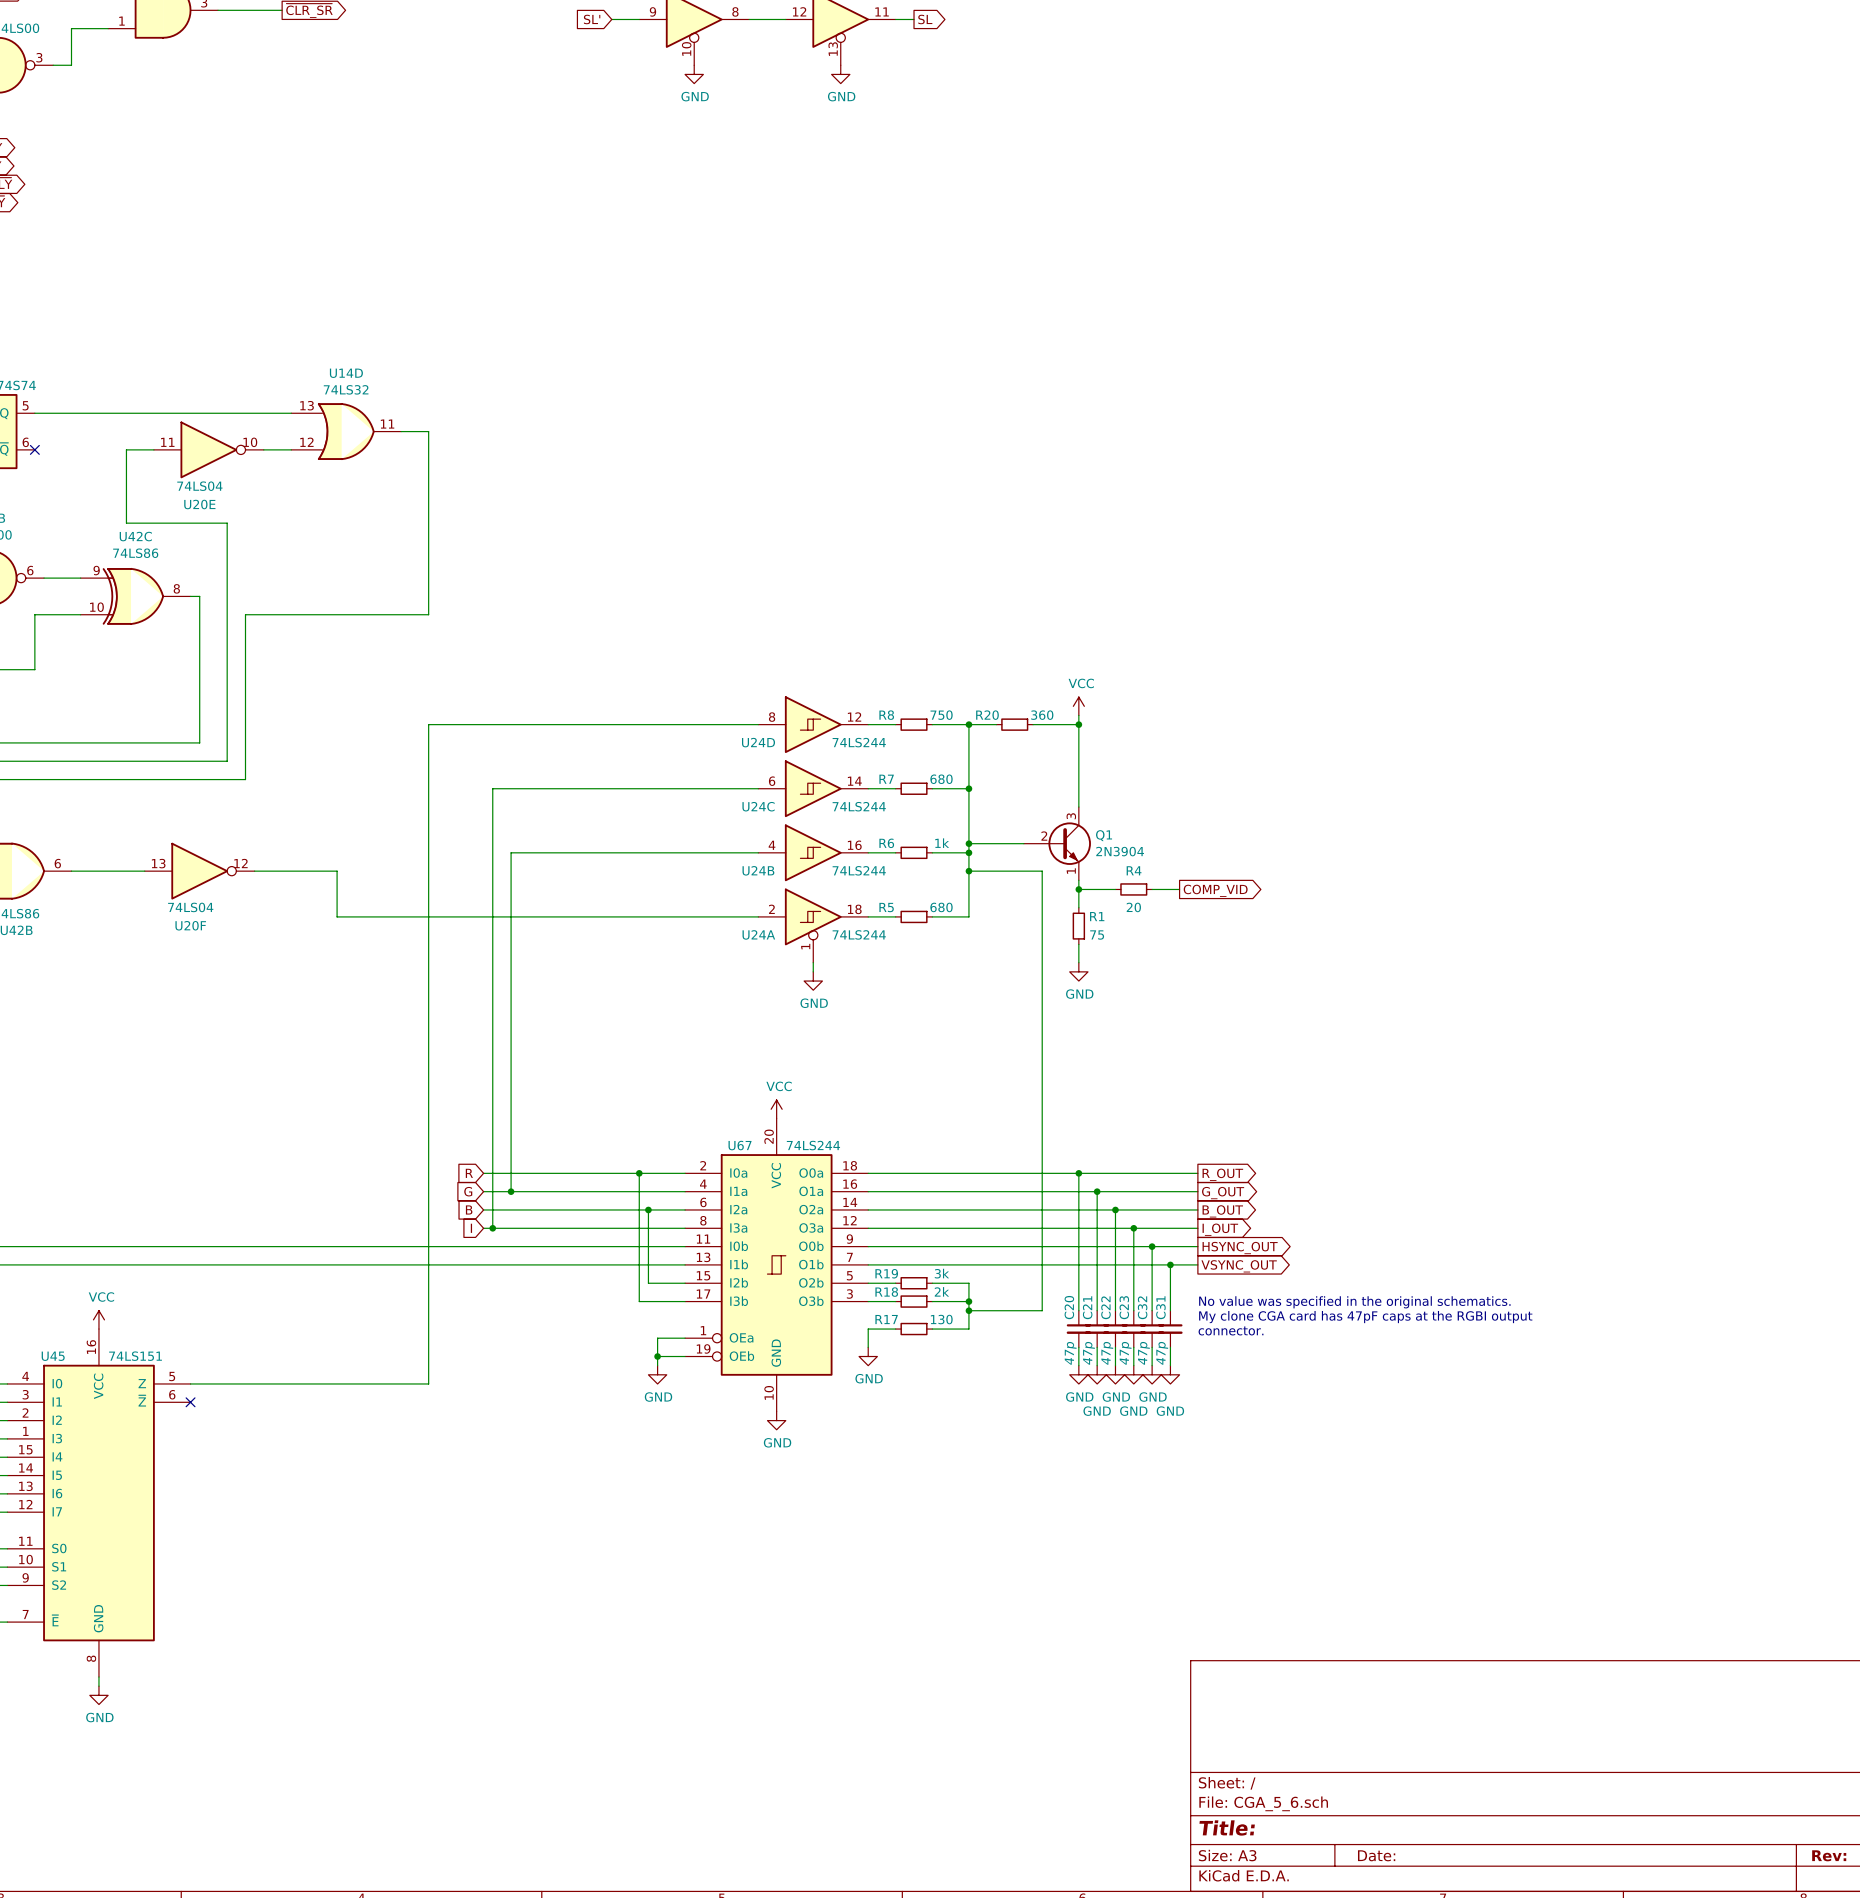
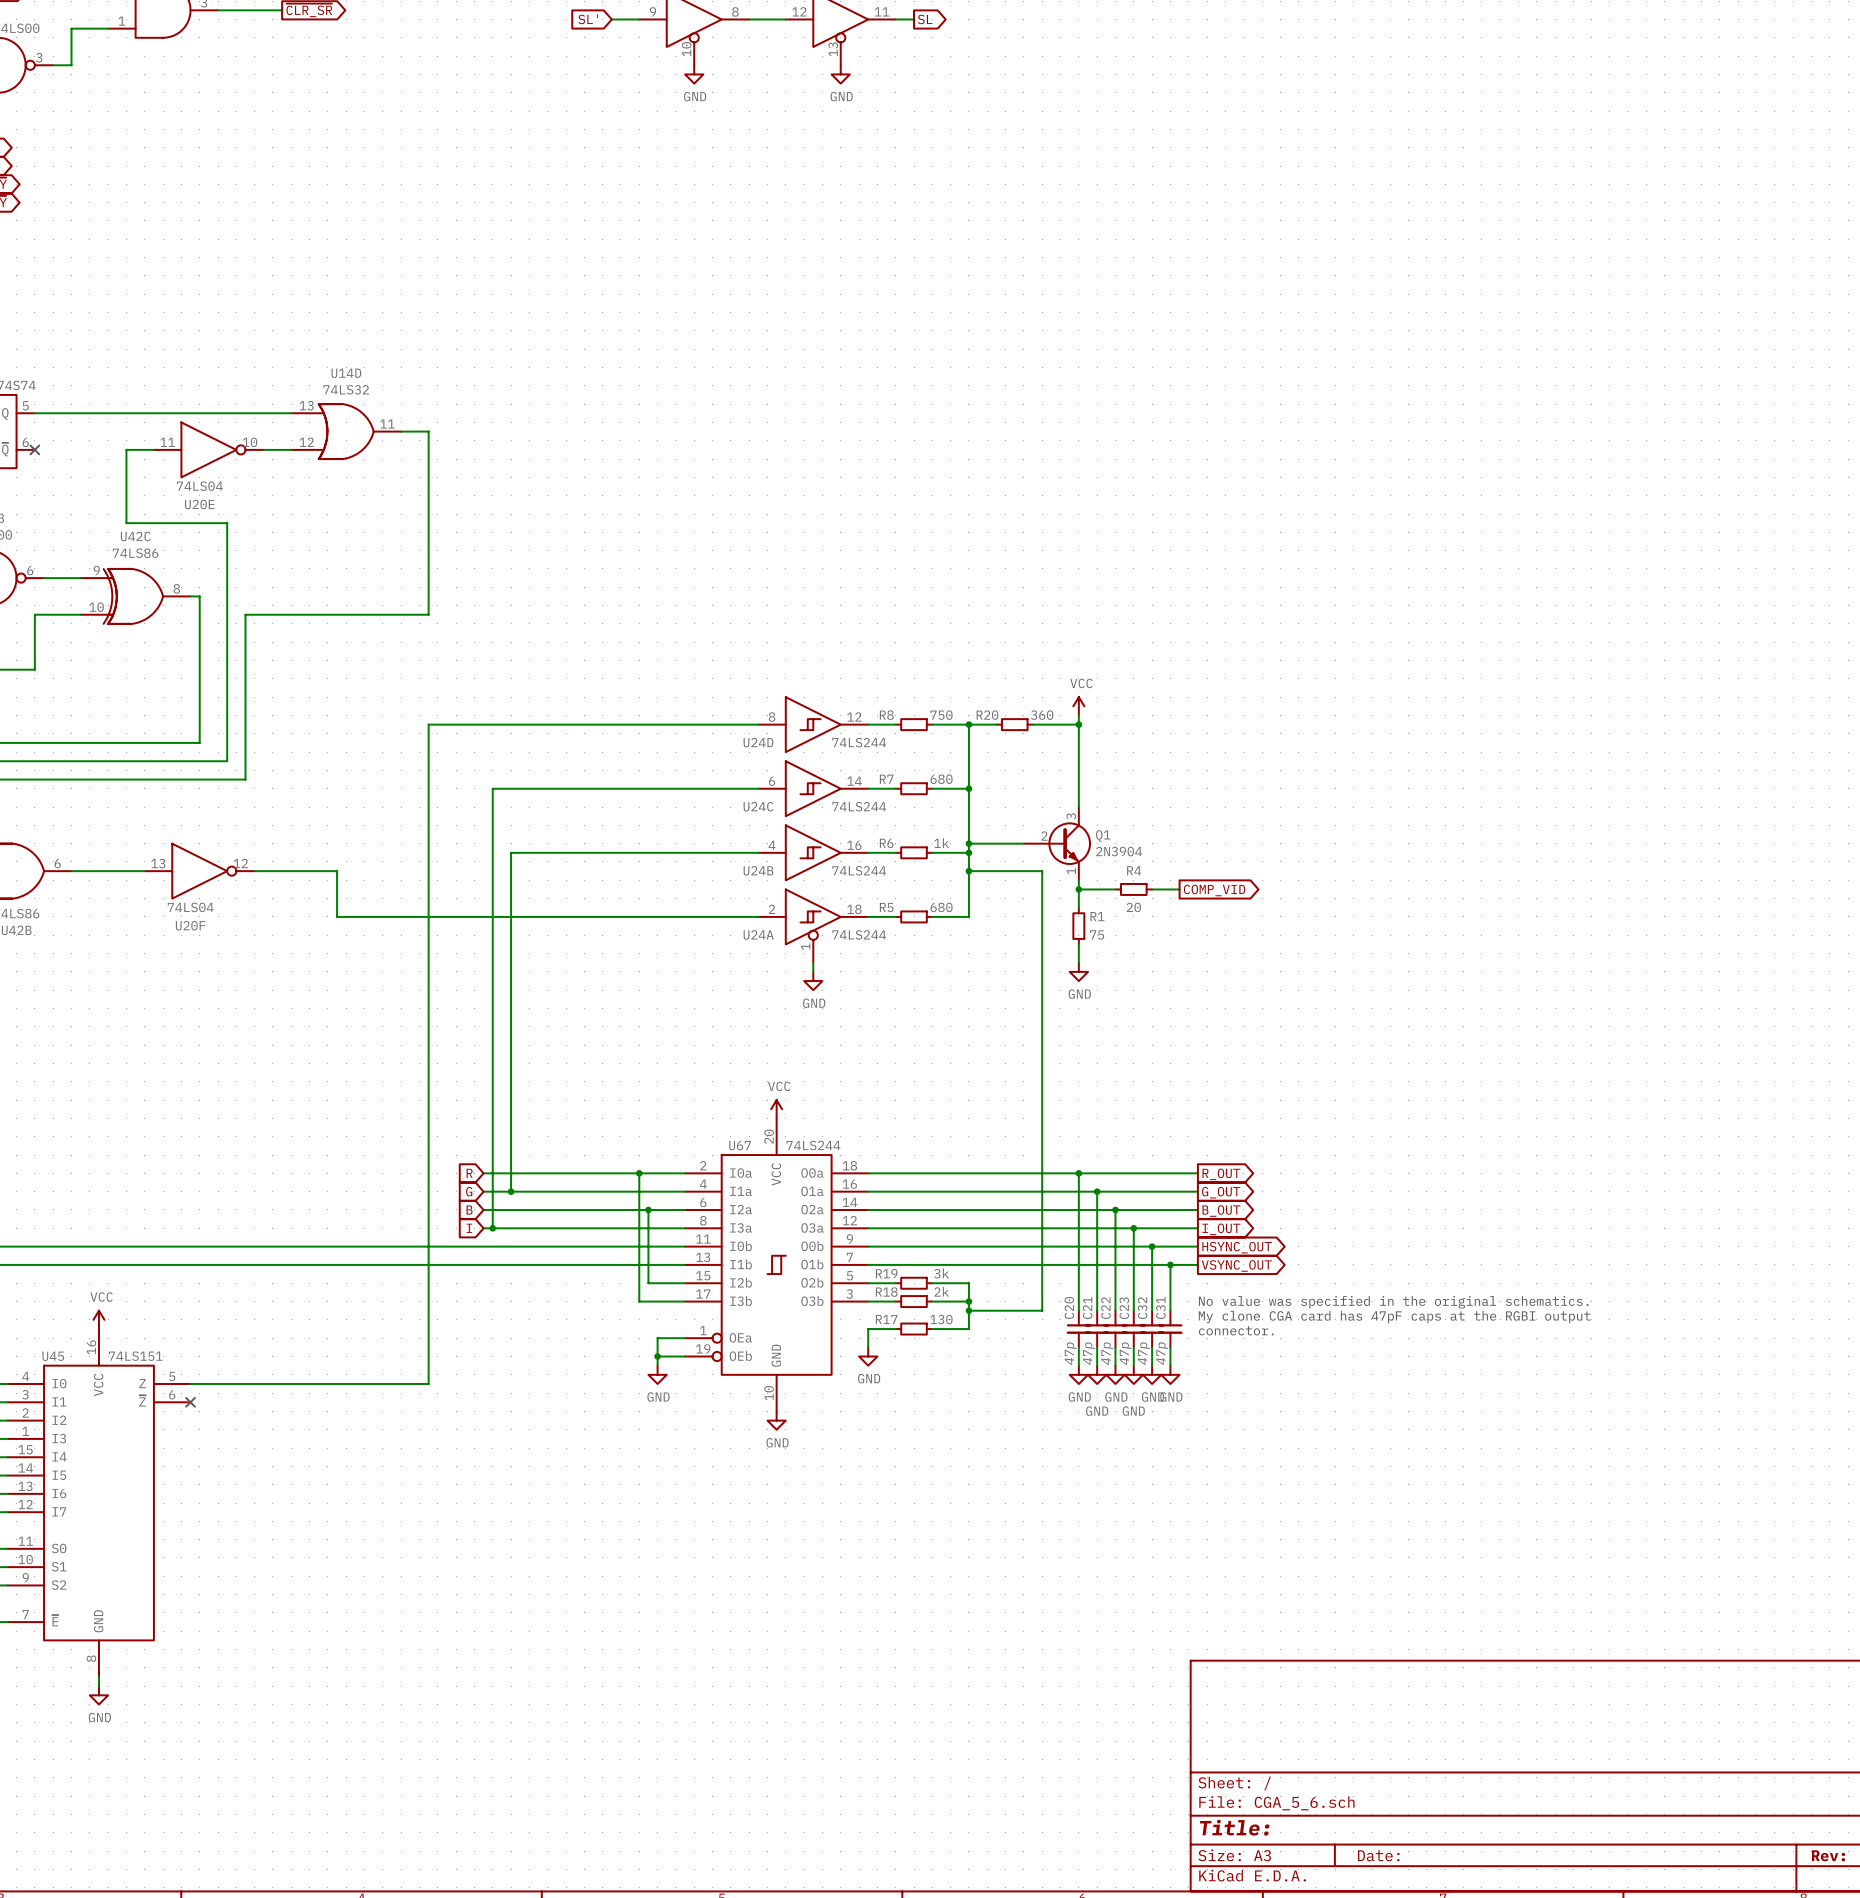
power symbol text position: GND (1170, 1411) -> GND (1171, 1397)

